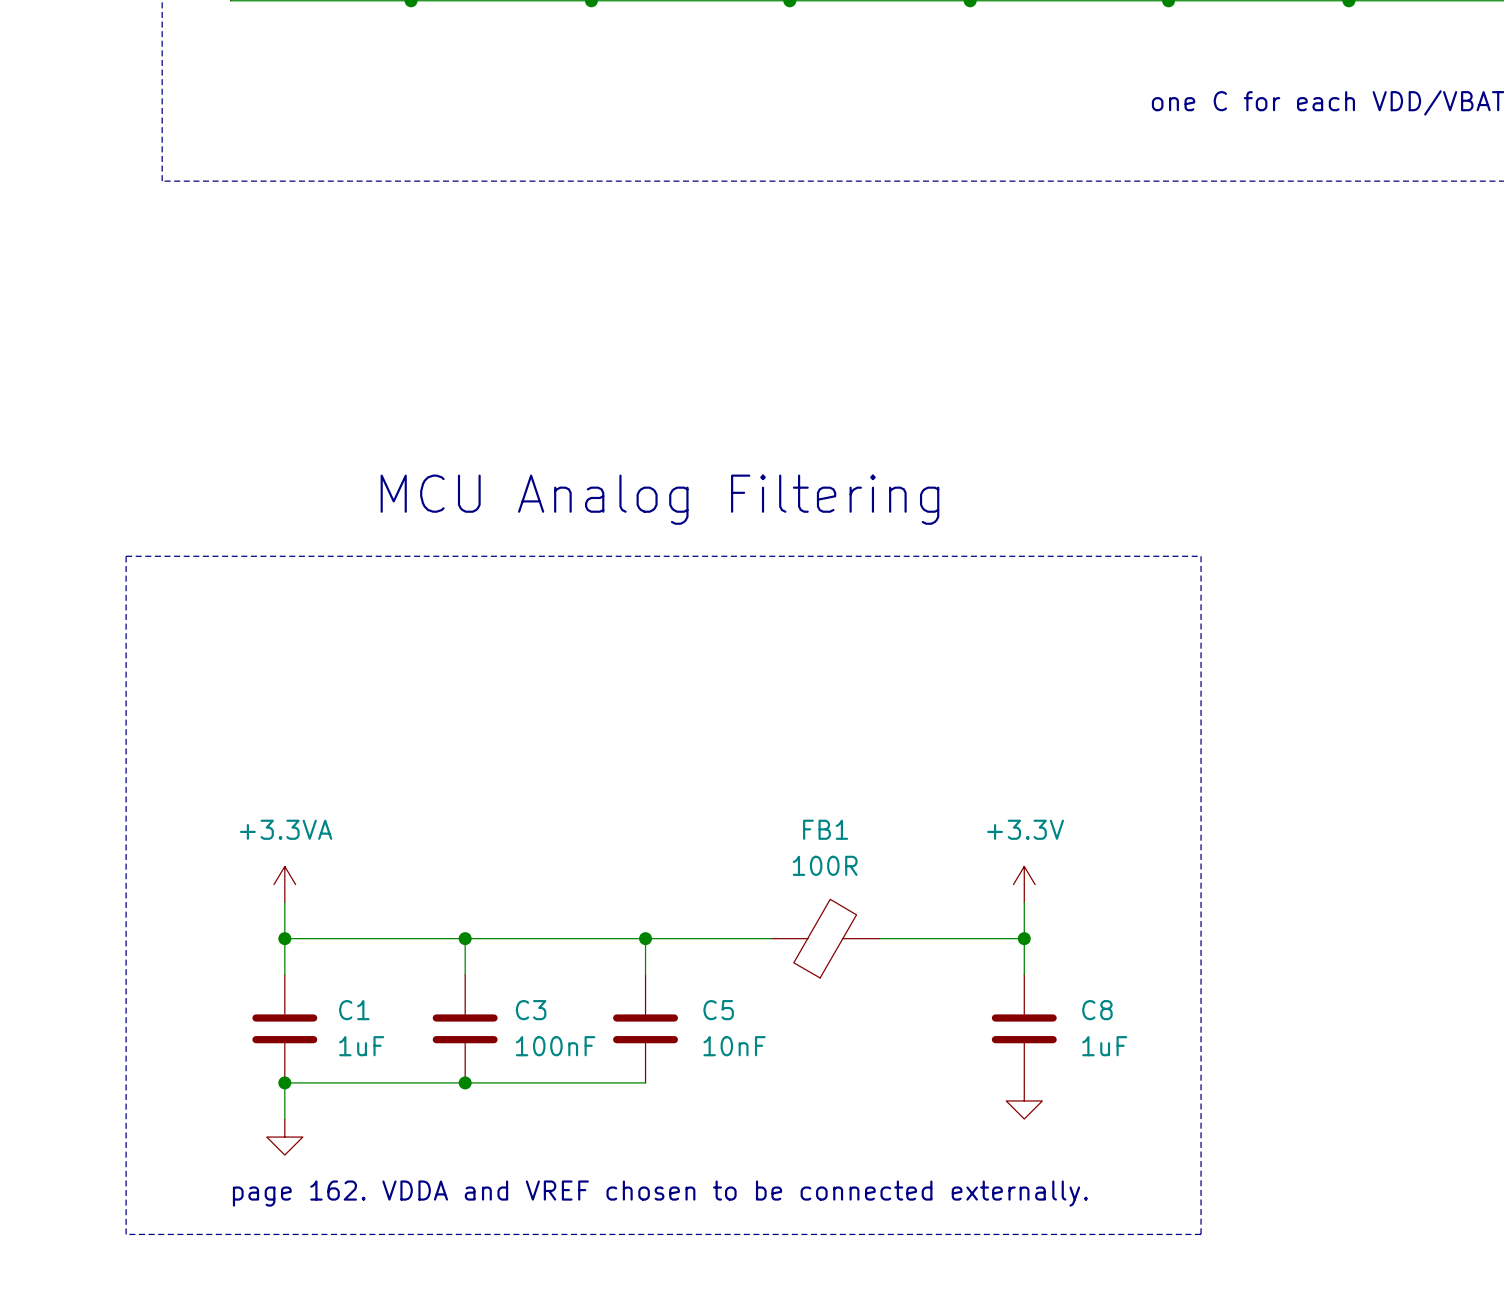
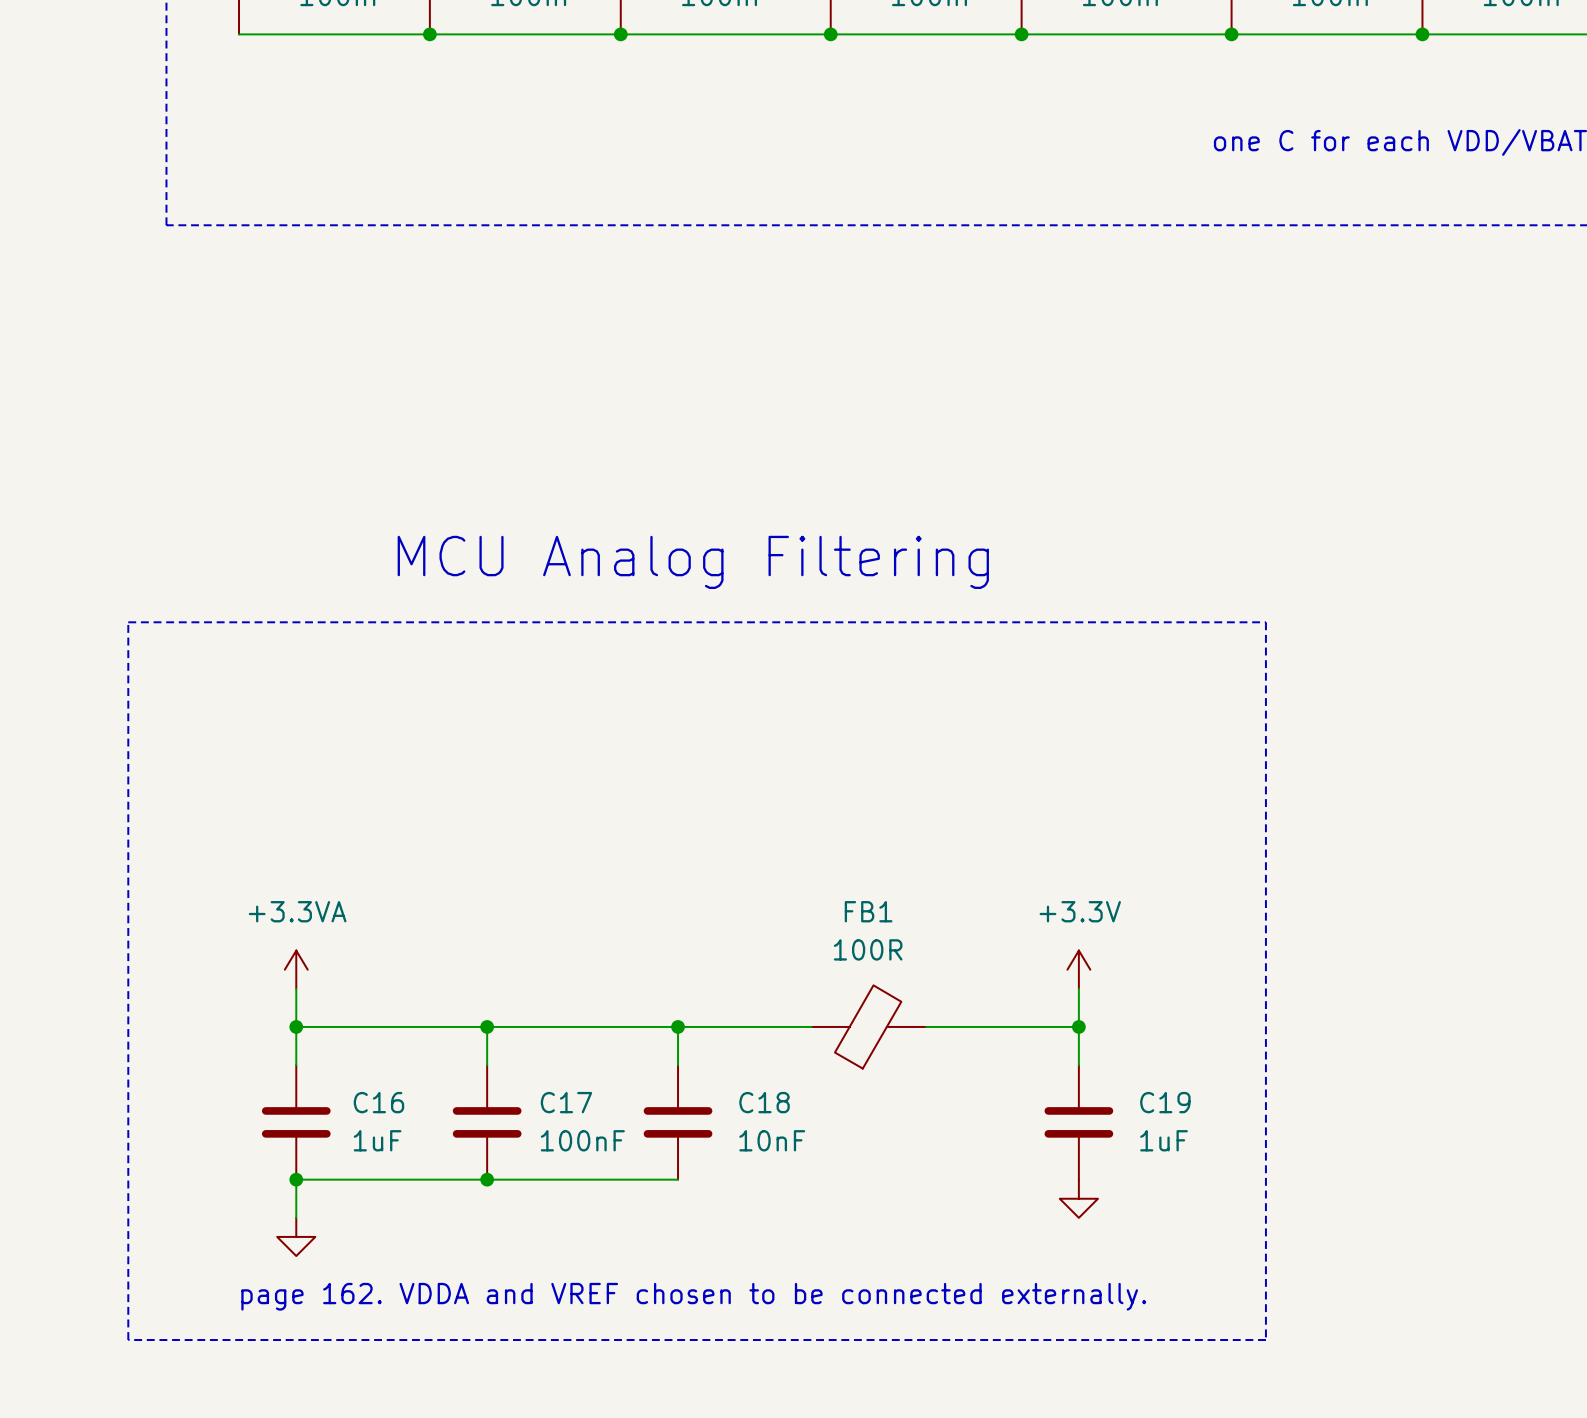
C1 name: C1 (354, 1010) -> C16 (378, 1102)
C3 name: C3 (531, 1010) -> C17 (566, 1102)
C5 name: C5 (718, 1010) -> C18 (764, 1102)
C8 name: C8 (1097, 1010) -> C19 (1165, 1102)

